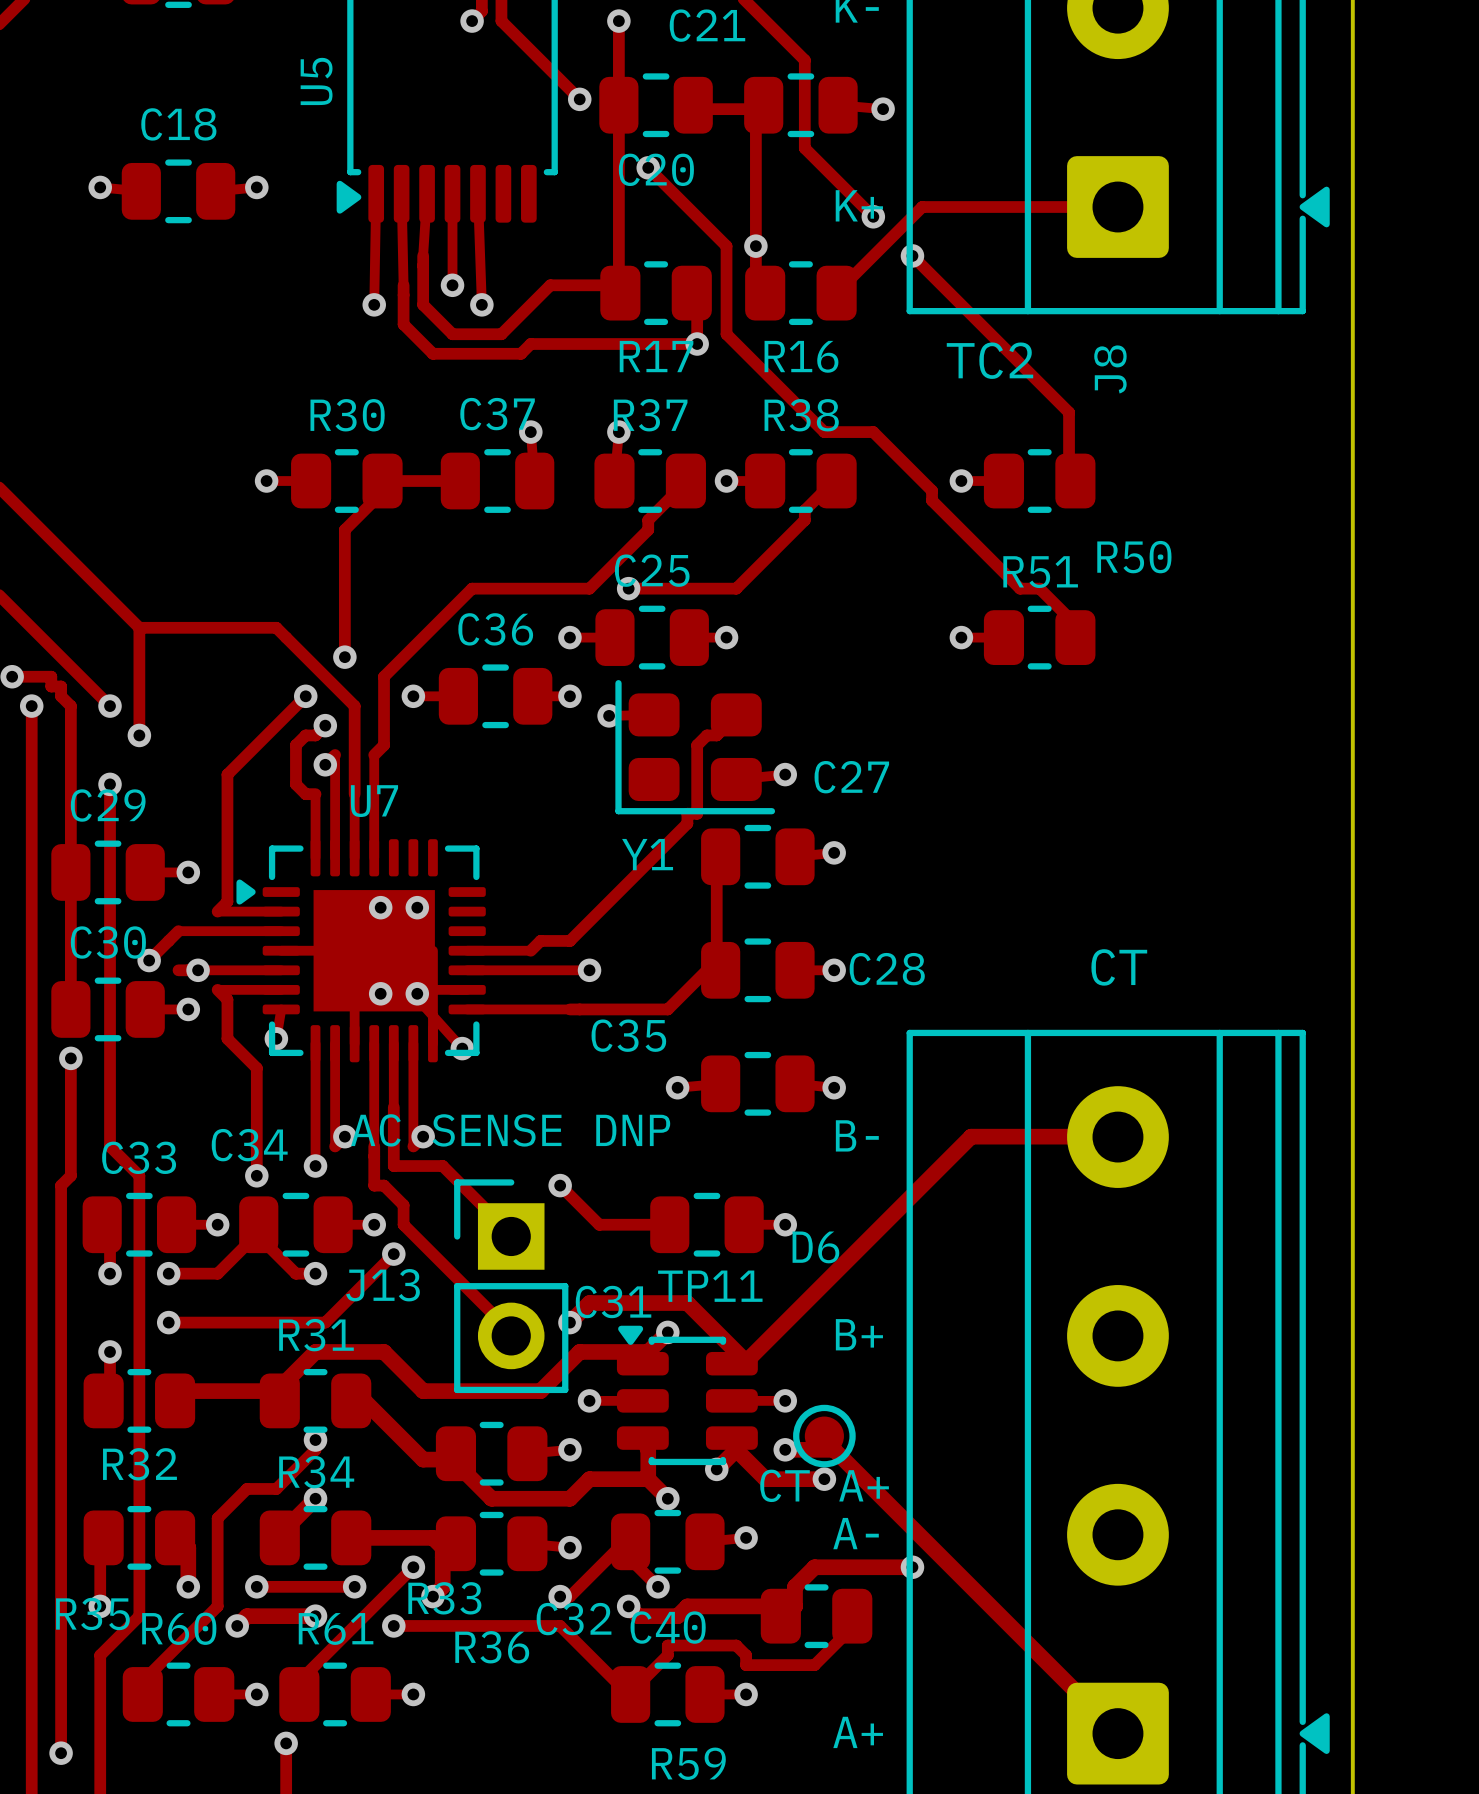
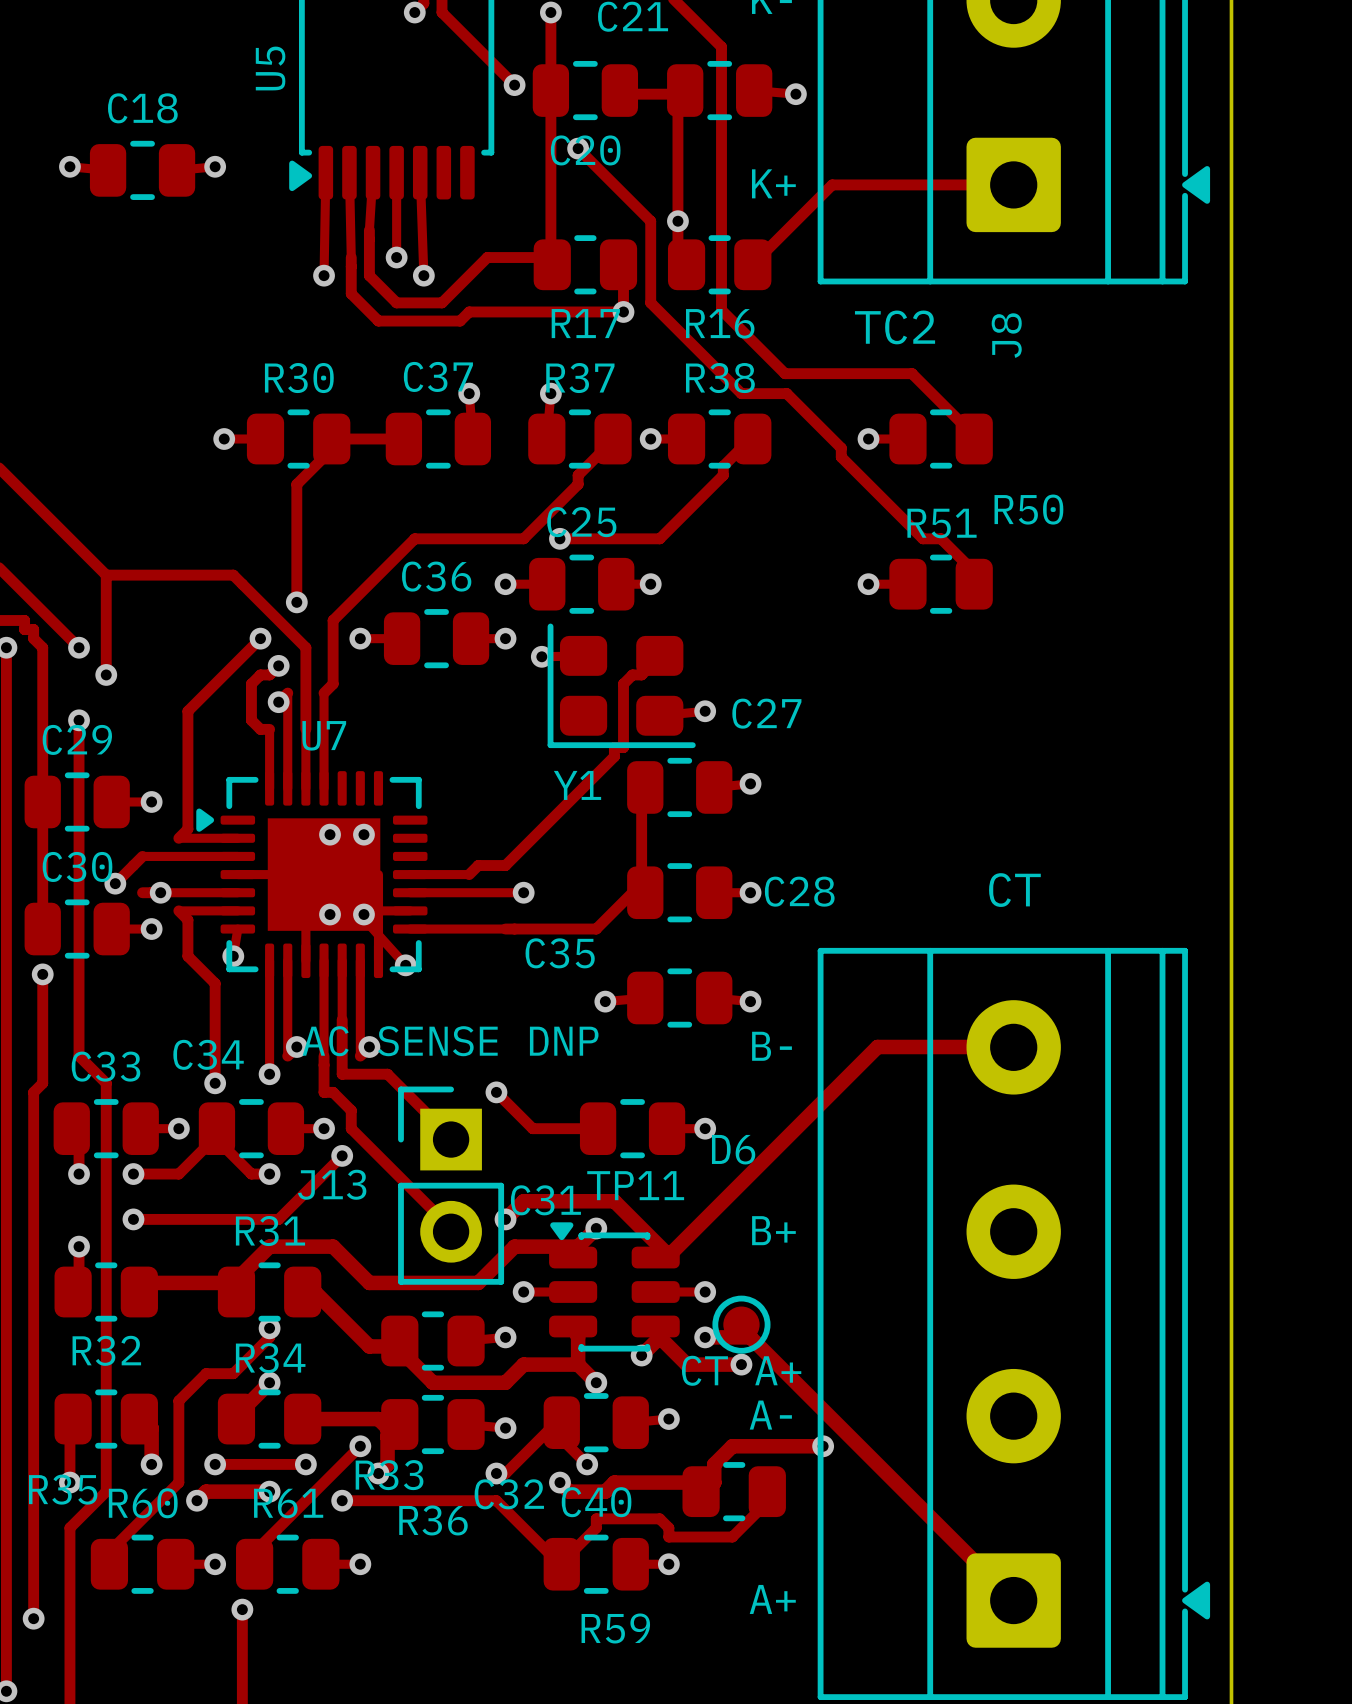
track: (802, 58) (804, 60) (804, 148) (873, 216) -> none
via: (873, 216) -> none
track: (912, 255) (1069, 412) (1069, 471) (1075, 481) -> (721, 46) (721, 310) (785, 373) (912, 373) (966, 428) (974, 439)
via: (912, 255) -> none

